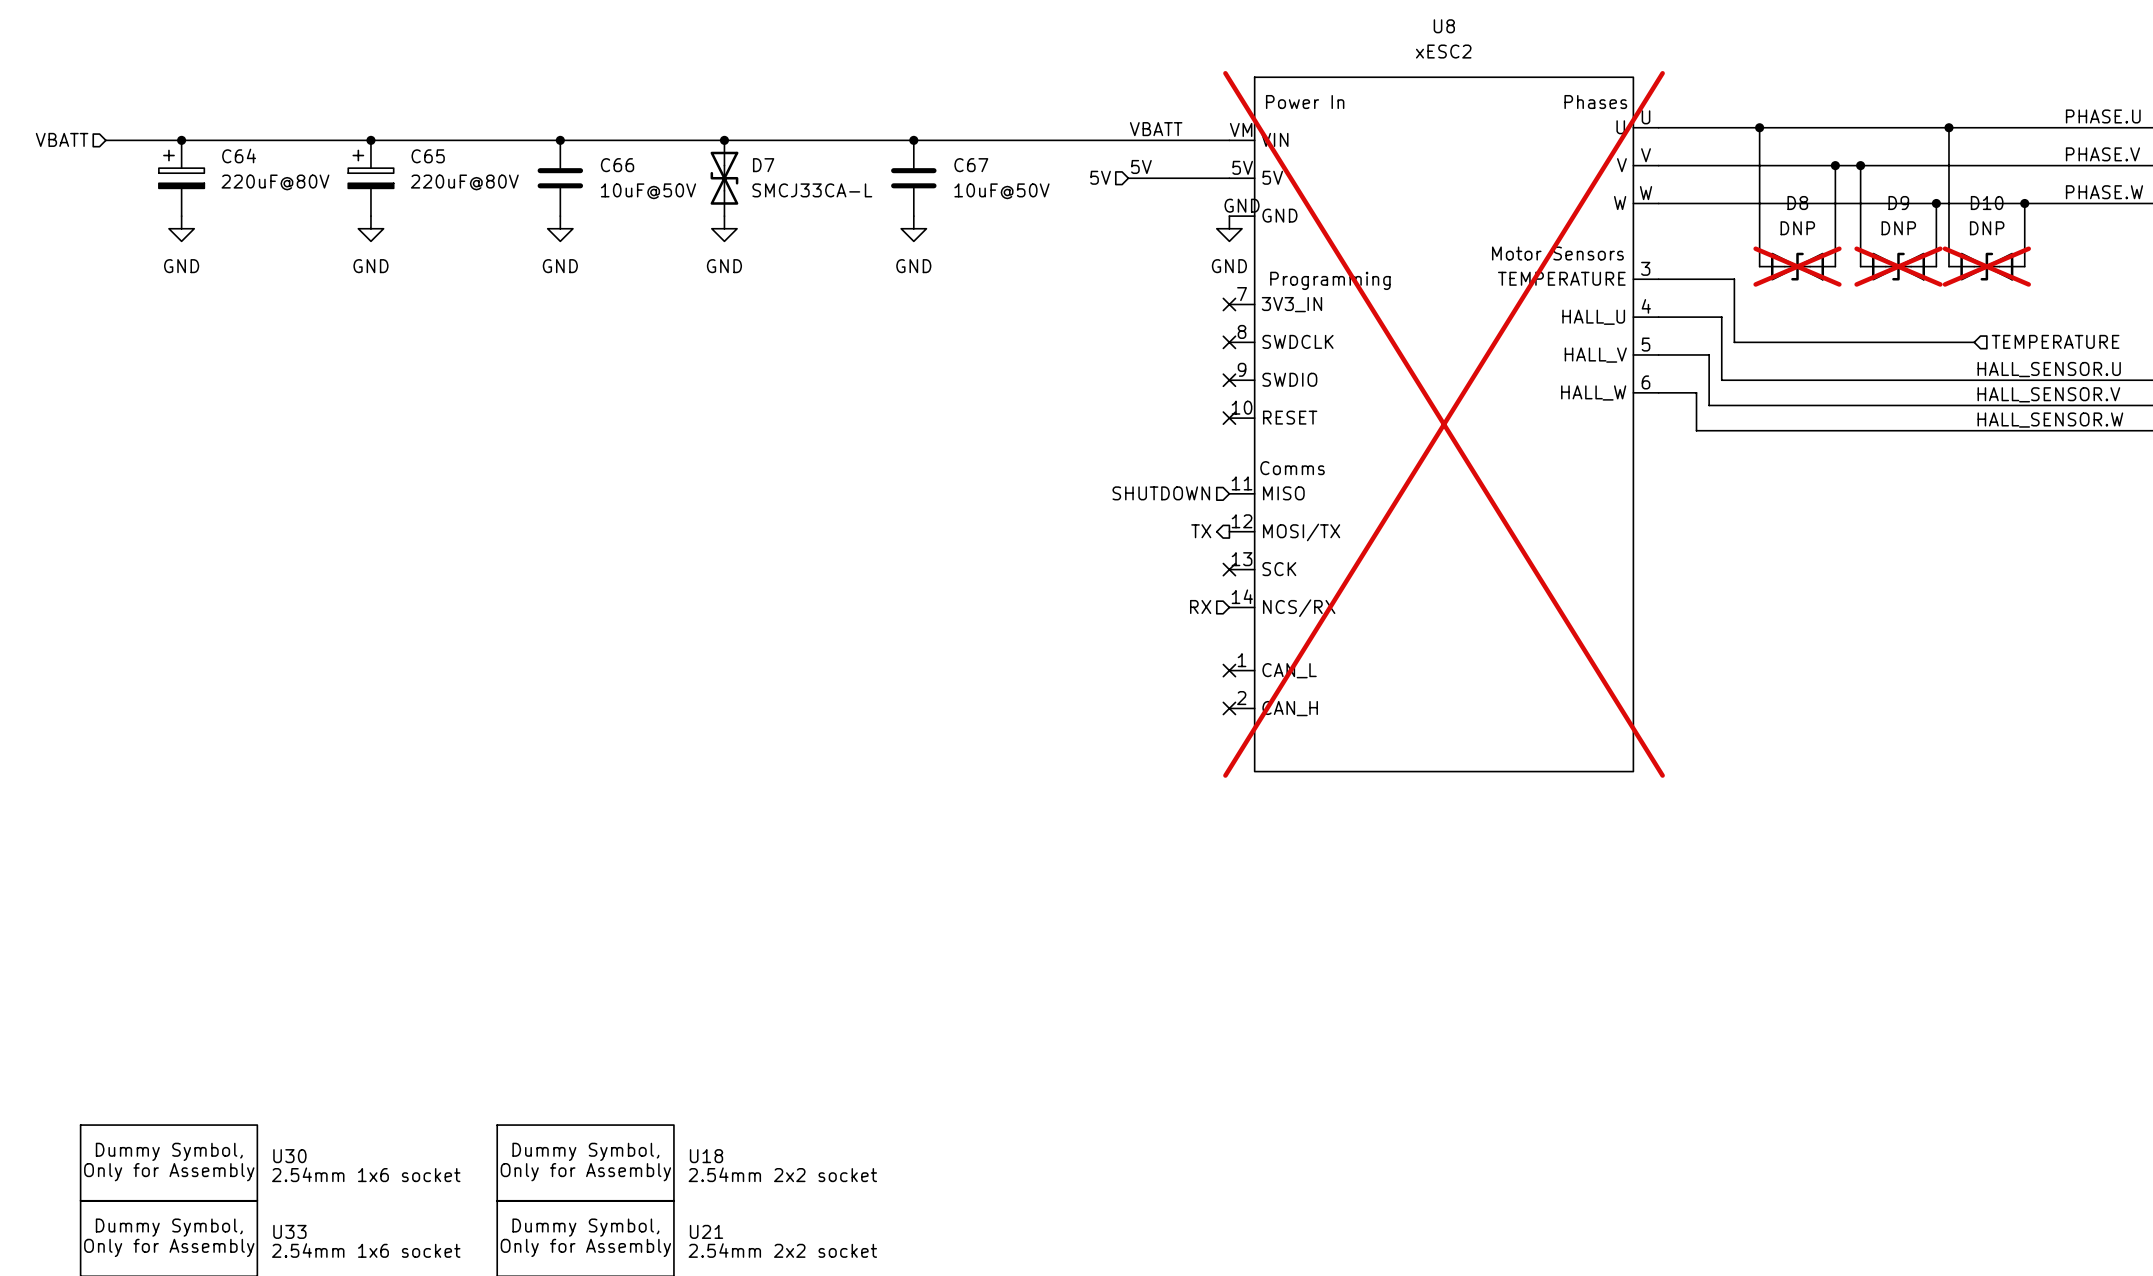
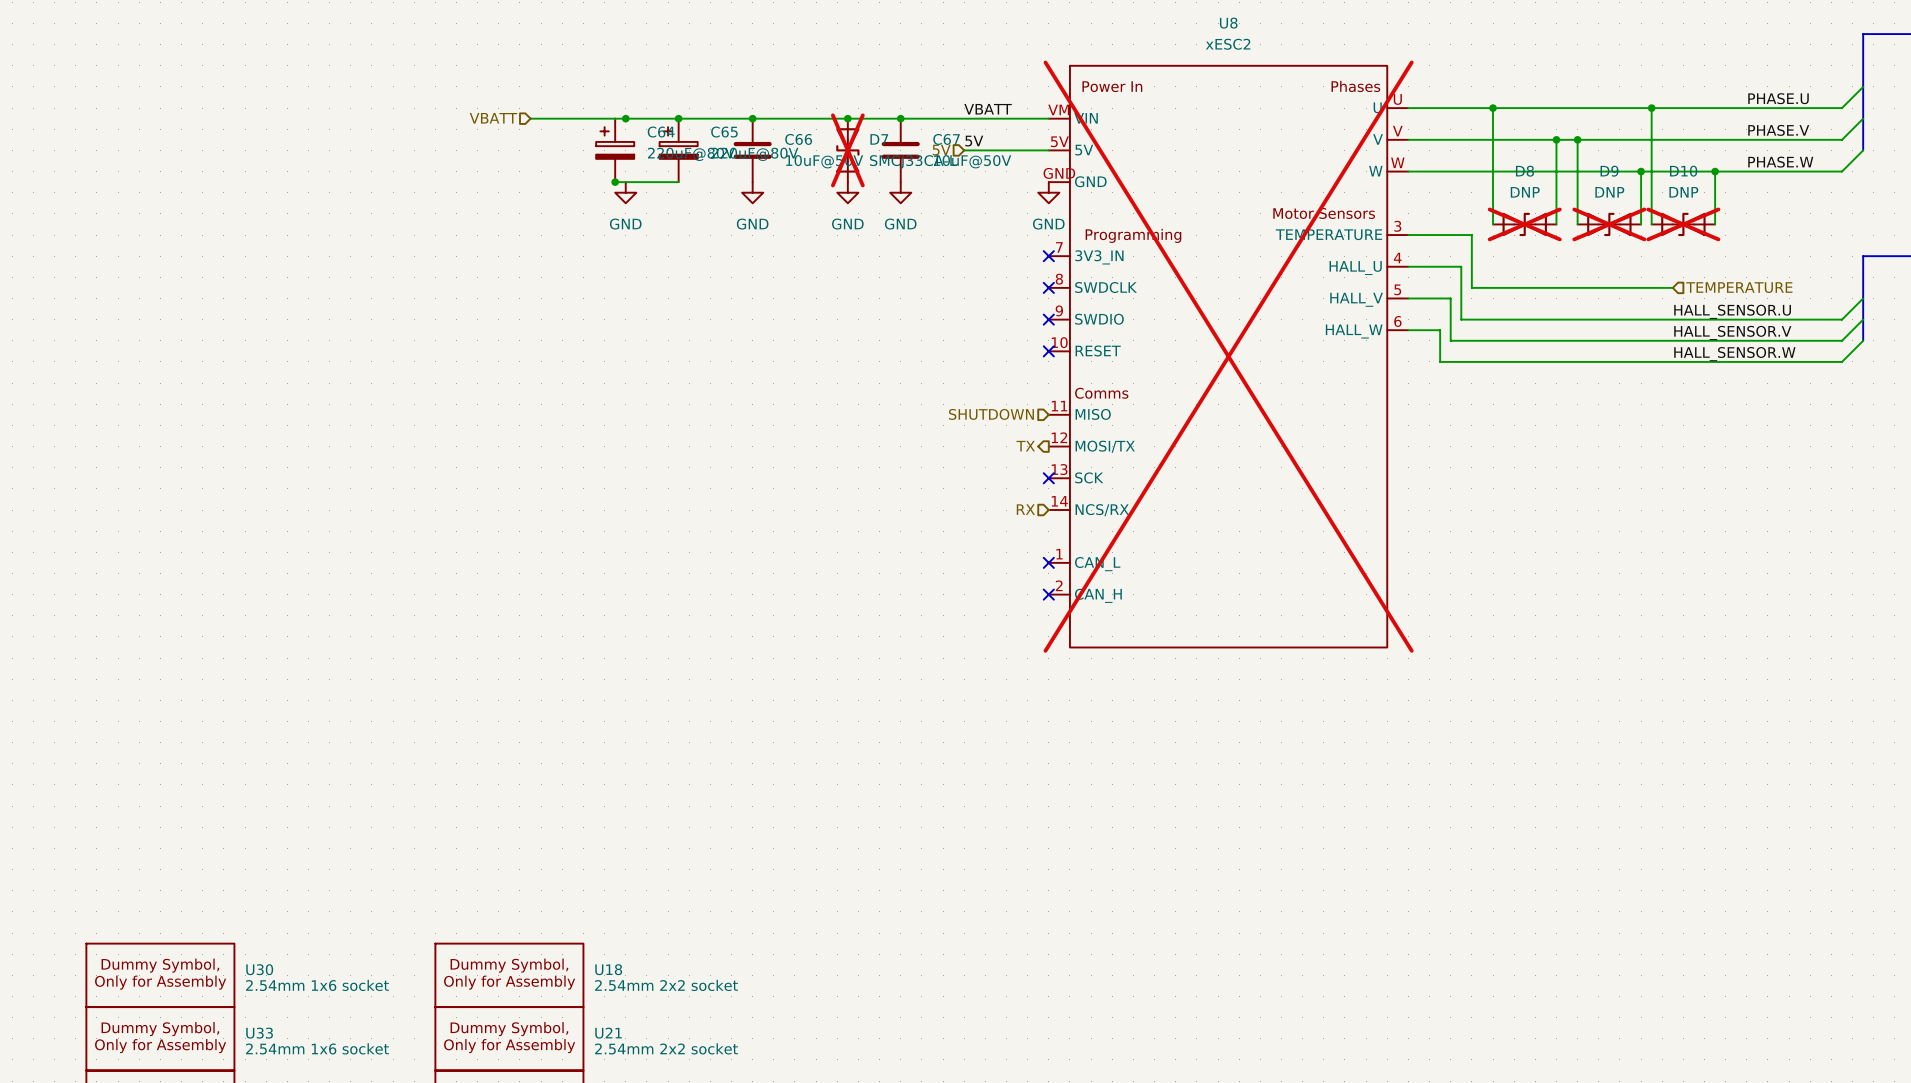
hierarchical label: VBATT (62, 139) -> none
hierarchical label: none -> VBATT (493, 118)
wire: (105, 140) (610, 140) -> none
junction: (181, 140) -> none
junction: (370, 140) -> none
junction: (560, 140) -> none
junction: none -> (678, 118)
junction: none -> (752, 118)
junction: (913, 140) -> none
junction: none -> (847, 118)
junction: none -> (900, 118)
C64 position: (181, 178) -> (615, 150)
C65 position: (370, 178) -> (678, 150)
C66 position: (560, 178) -> (752, 150)
D7 position: (724, 178) -> (847, 150)
C67 position: (913, 178) -> (900, 150)
D7 do-not-place cross: none -> (847, 150)
wire: none -> (615, 182) (678, 182)
junction: none -> (615, 182)
power symbol: GND (181, 228) -> none
power symbol: GND (370, 228) -> none
power symbol: GND (560, 228) -> none
power symbol: none -> GND (752, 192)
power symbol: GND (913, 228) -> none
power symbol: none -> GND (847, 192)
power symbol: none -> GND (900, 192)

